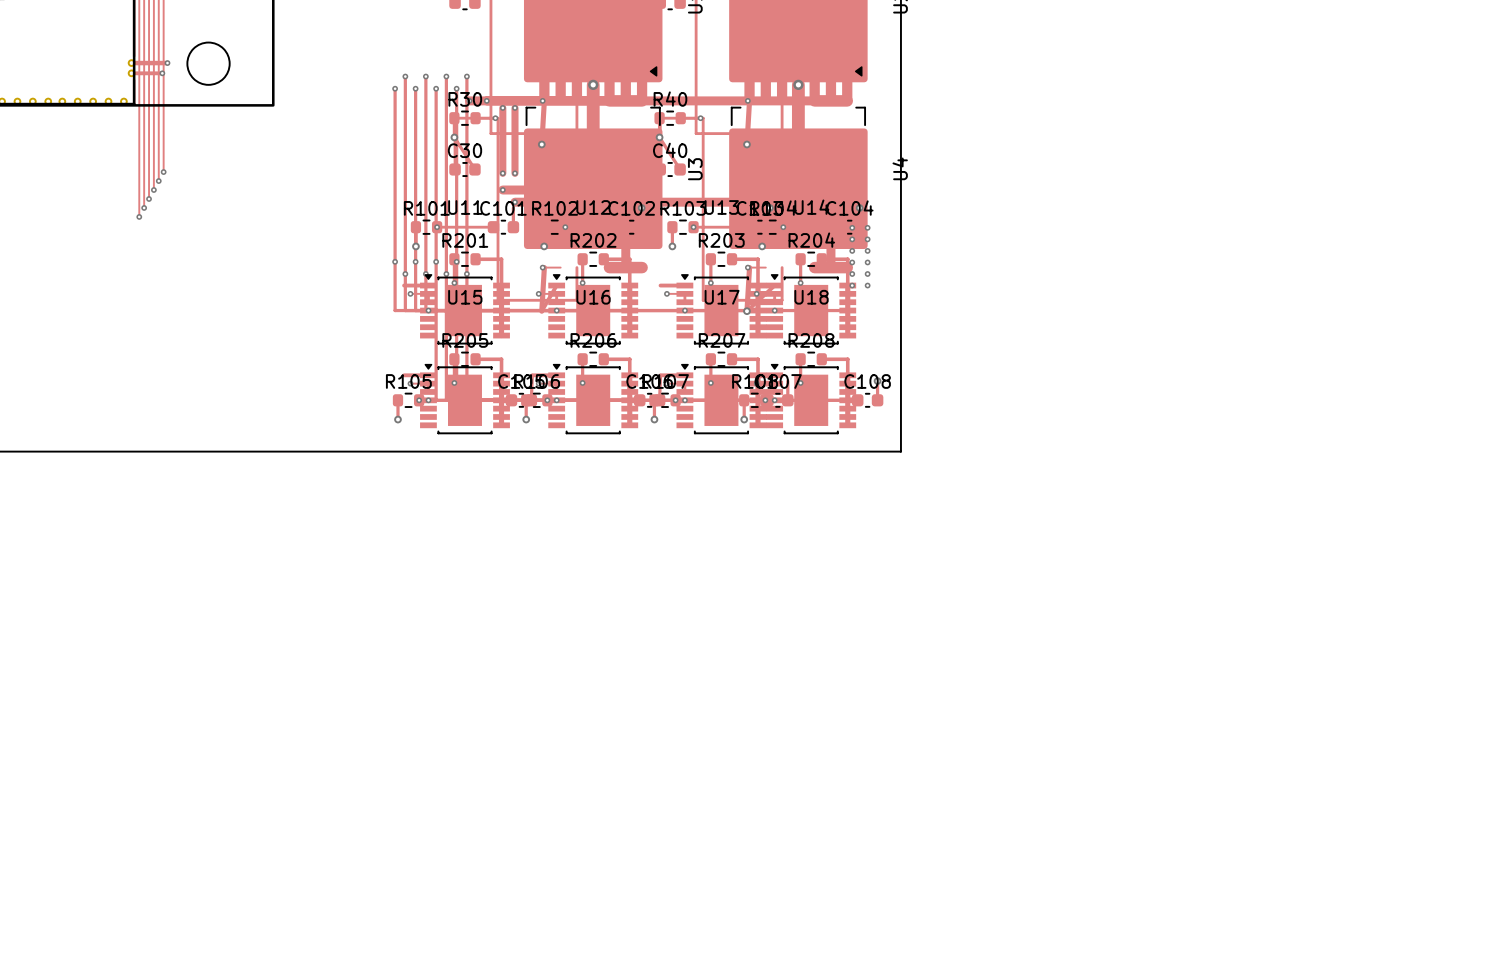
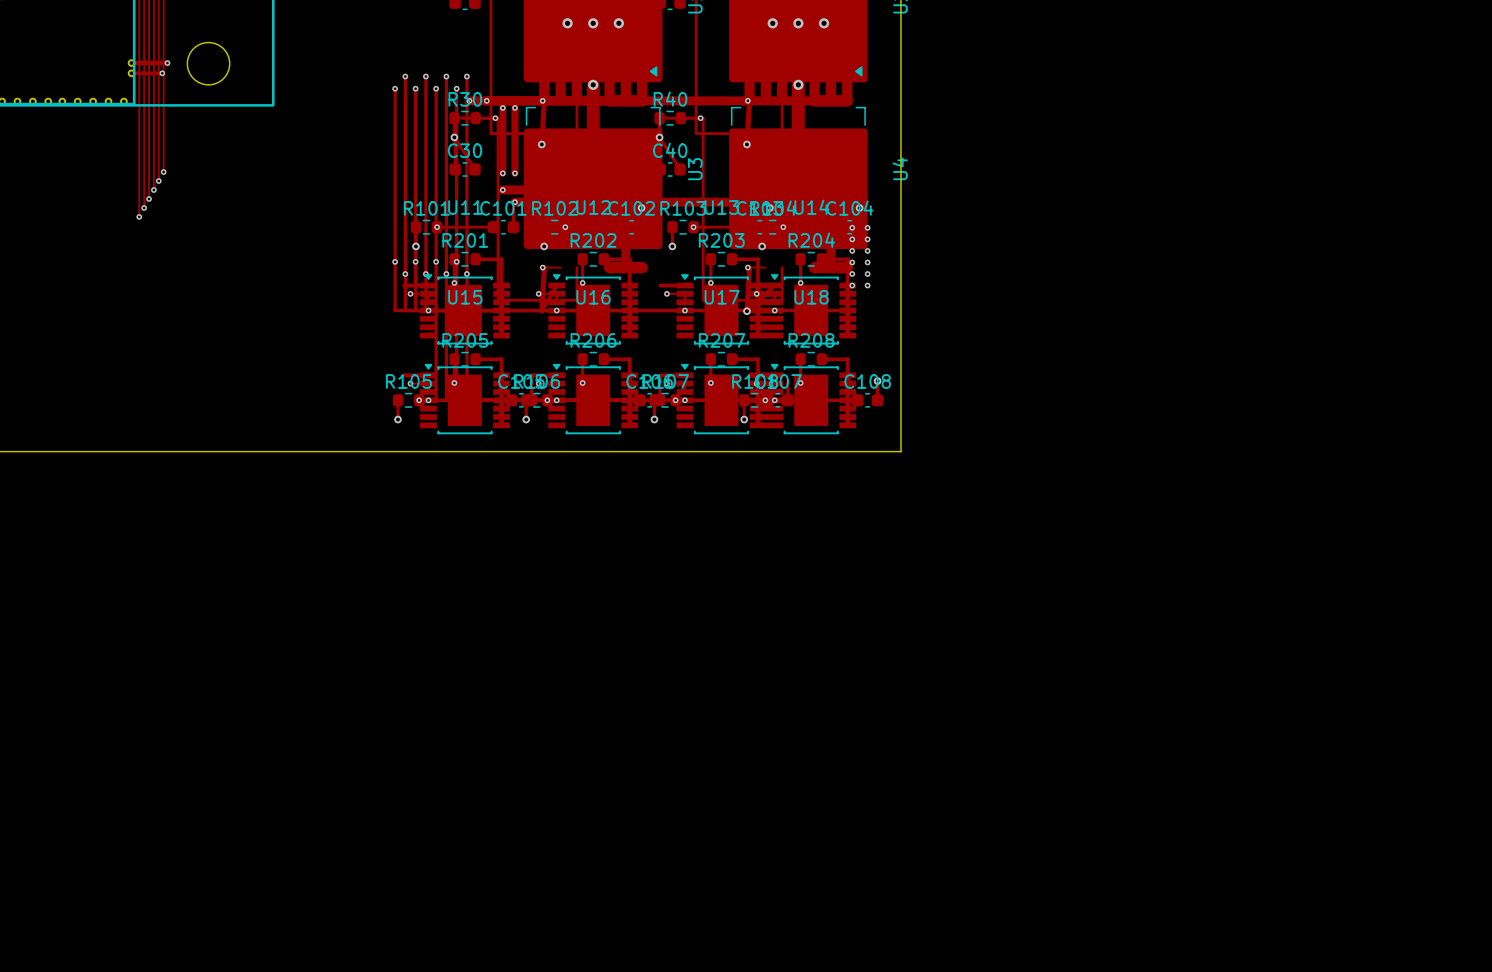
via: none -> (567, 23)
via: none -> (593, 23)
via: none -> (618, 23)
via: none -> (772, 23)
via: none -> (798, 23)
via: none -> (824, 23)

